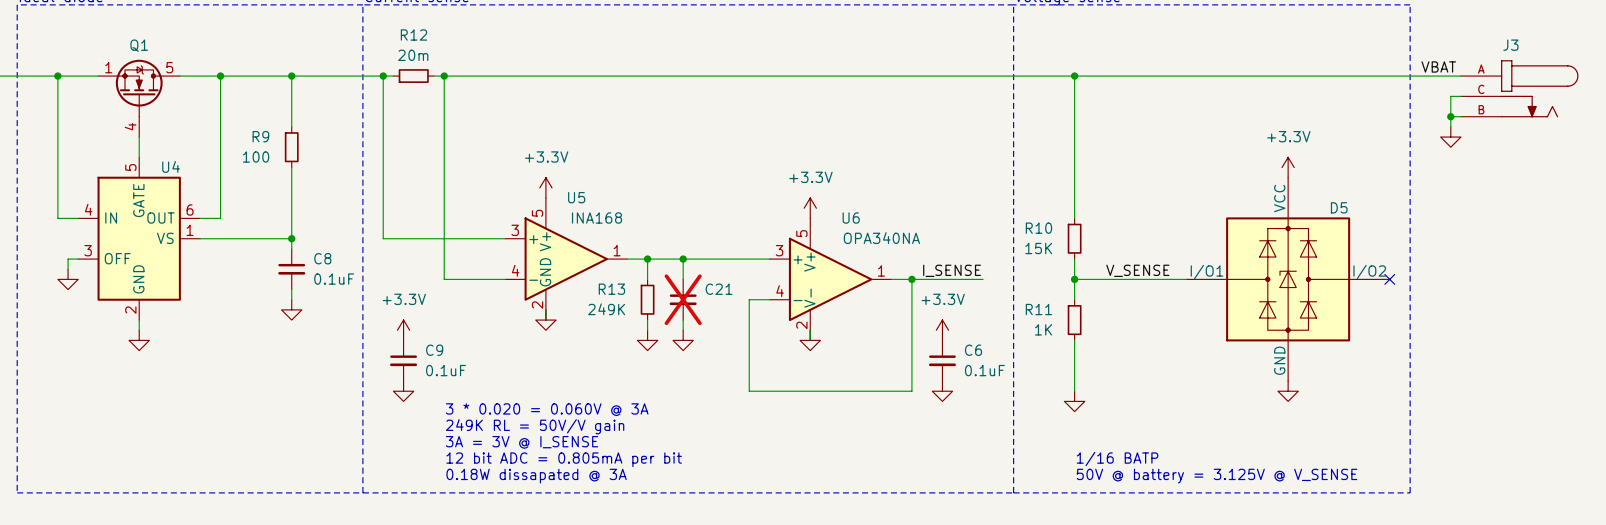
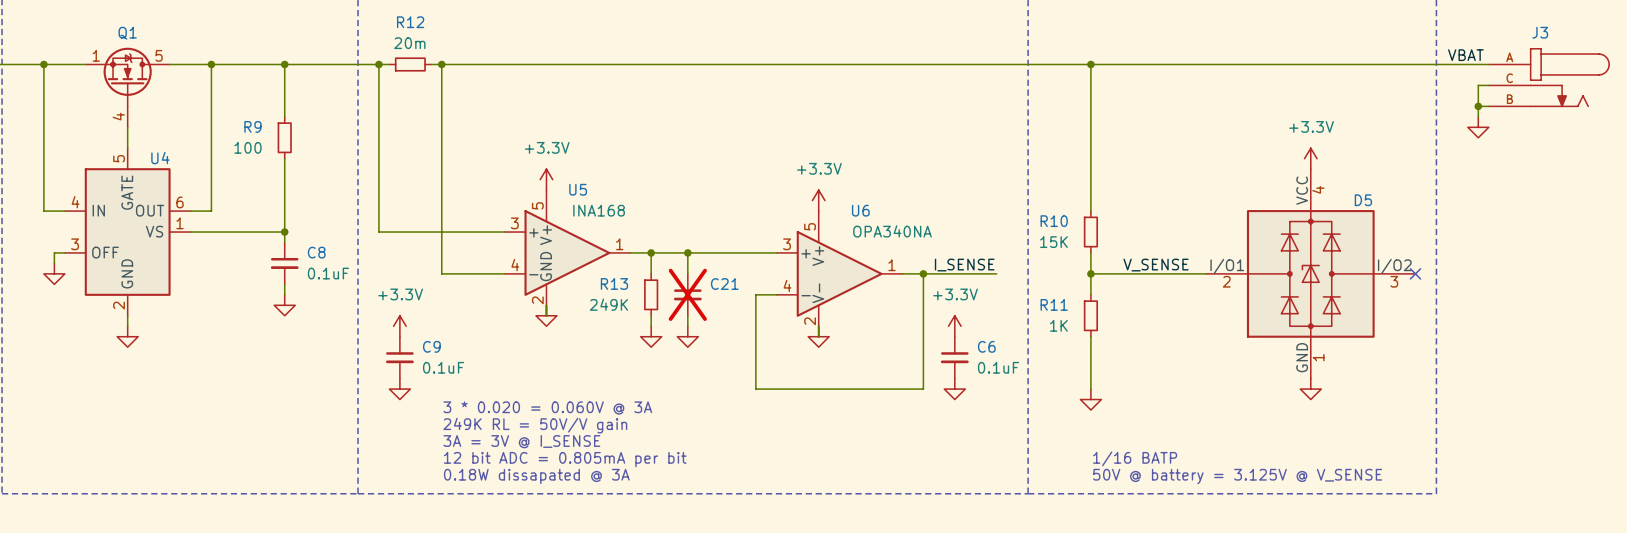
D5 pin number: none -> 4 (1318, 189)
D5 pin number: none -> 2 (1226, 281)
D5 pin number: none -> 3 (1394, 281)
D5 pin number: none -> 1 (1318, 357)

